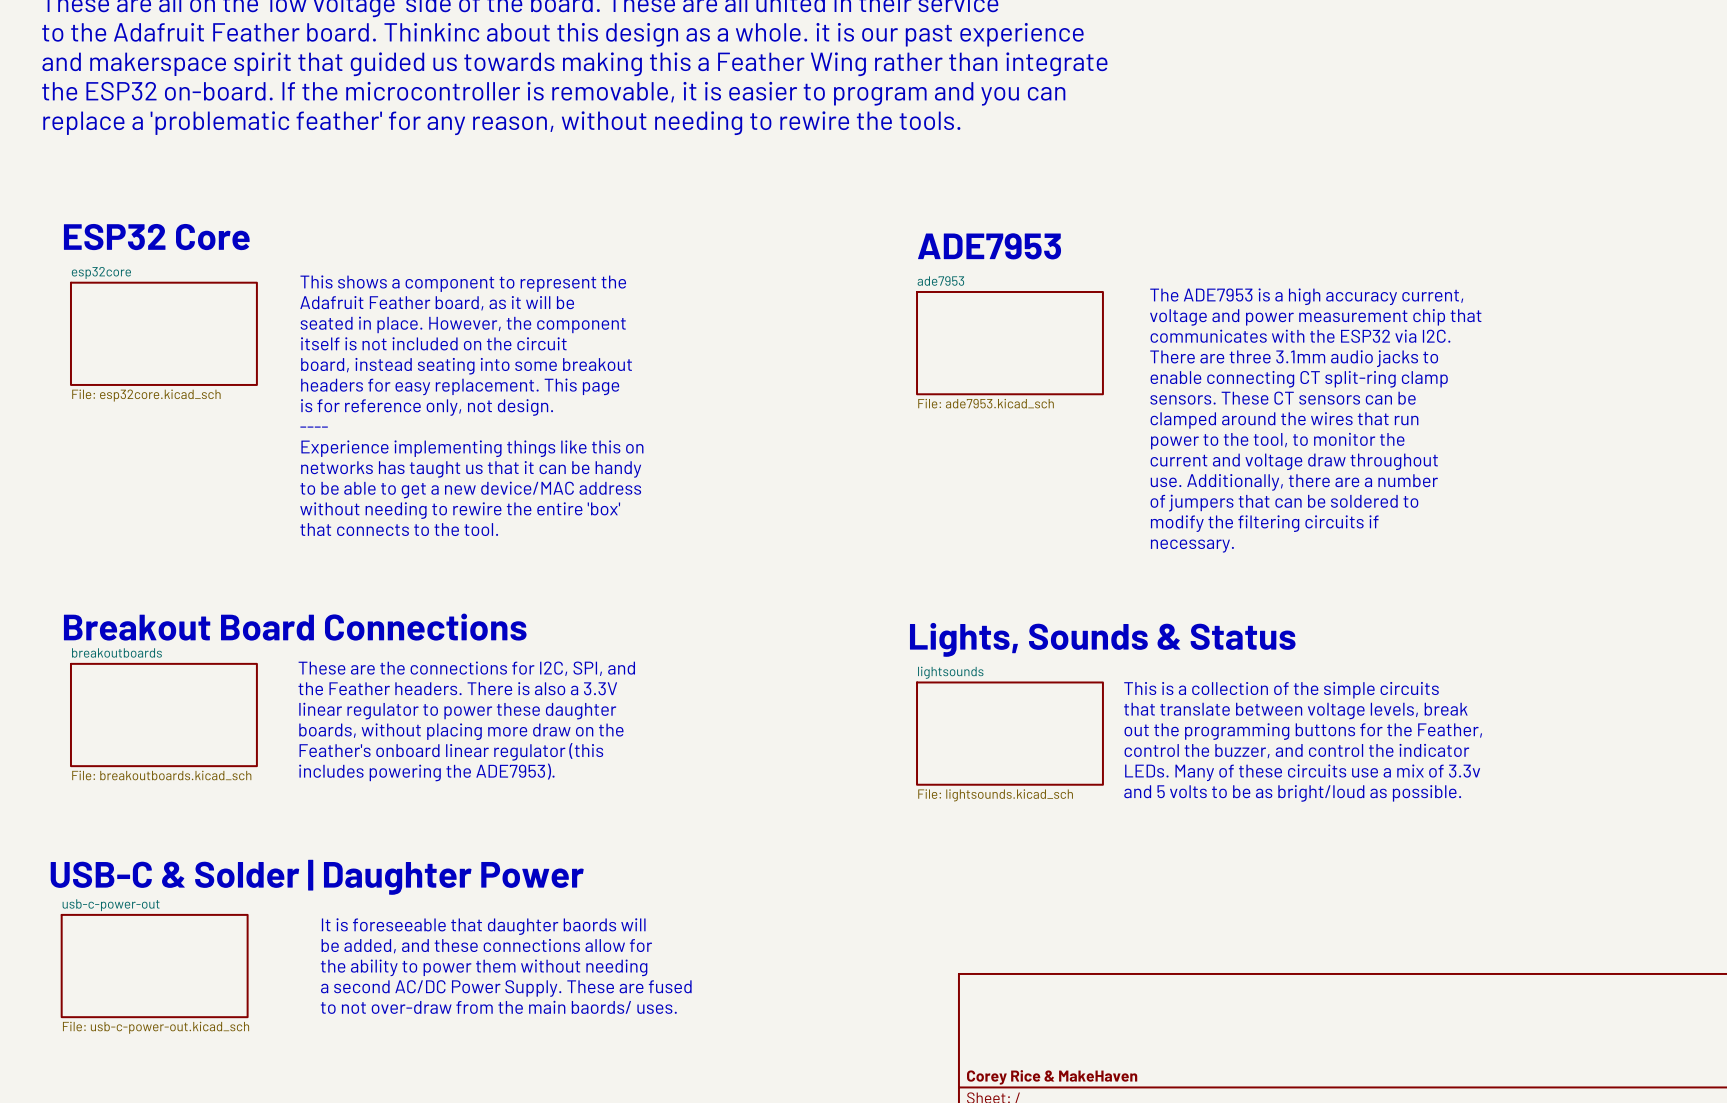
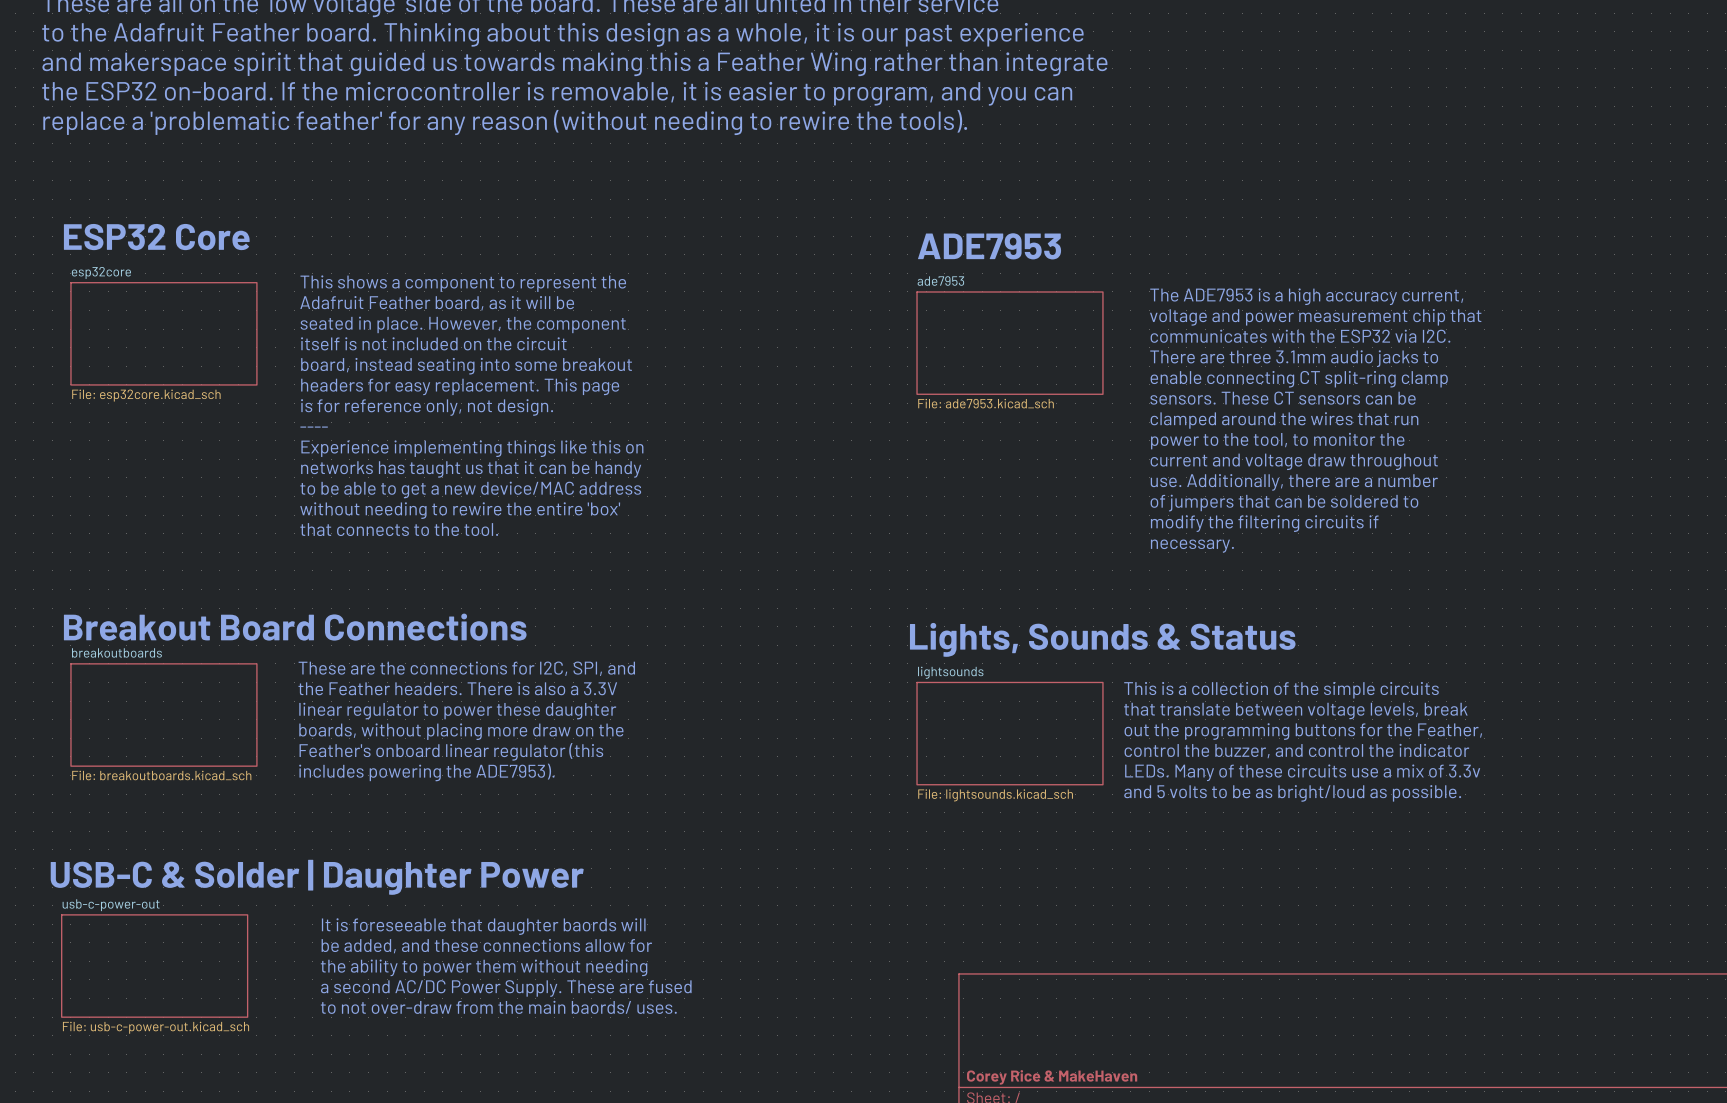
text: to the Adafruit Feather board. Thinkinc about this design as a whole. it is our past experience (562, 34) -> to the Adafruit Feather board. Thinking about this design as a whole, it is our past experience (562, 34)
text: the ESP32 on-board. If the microcontroller is removable, it is easier to program and you can (553, 93) -> the ESP32 on-board. If the microcontroller is removable, it is easier to program, and you can (557, 93)
text: replace a 'problematic feather' for any reason, without needing to rewire the tools. (501, 123) -> replace a 'problematic feather' for any reason (without needing to rewire the tools). (505, 122)

